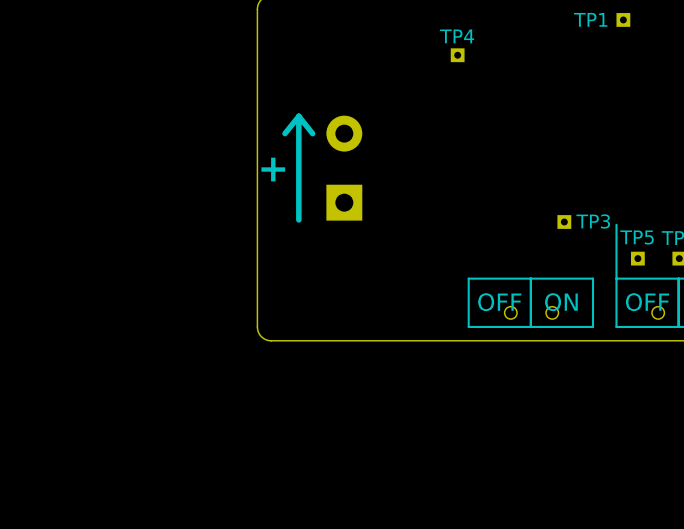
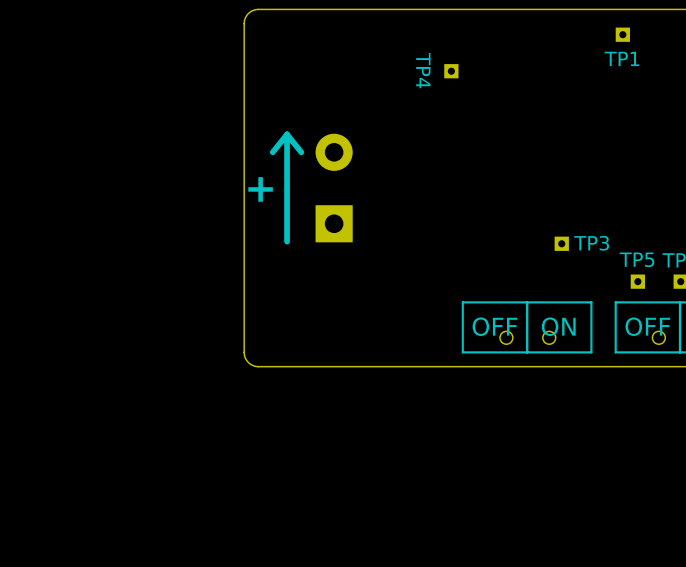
TP1 name position: TP1 (590, 19) -> TP1 (621, 58)
TP4 name rotation: 0° (457, 36) -> 90° clockwise (423, 70)
line: (616, 224) (616, 278) -> none

